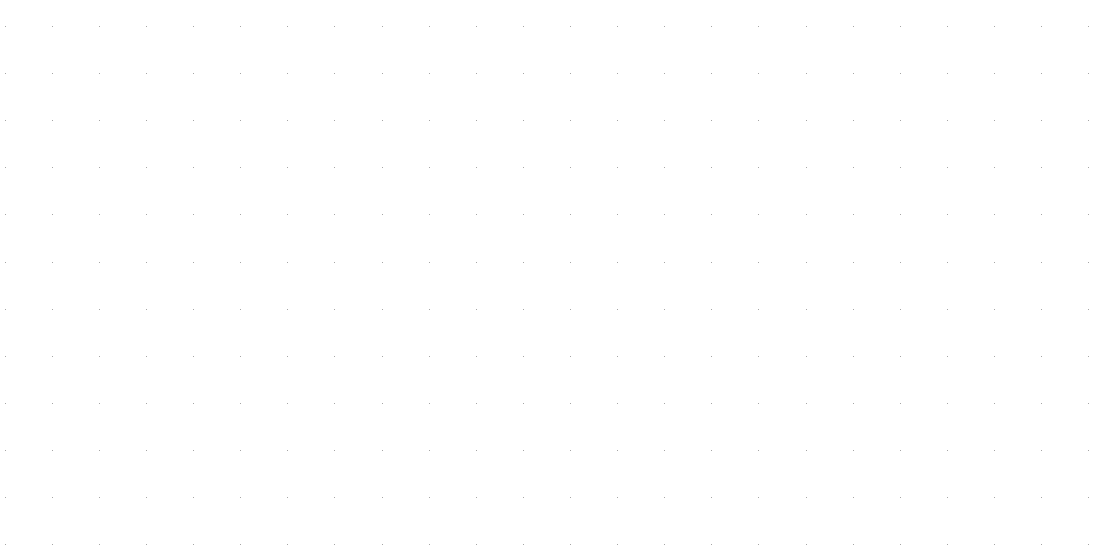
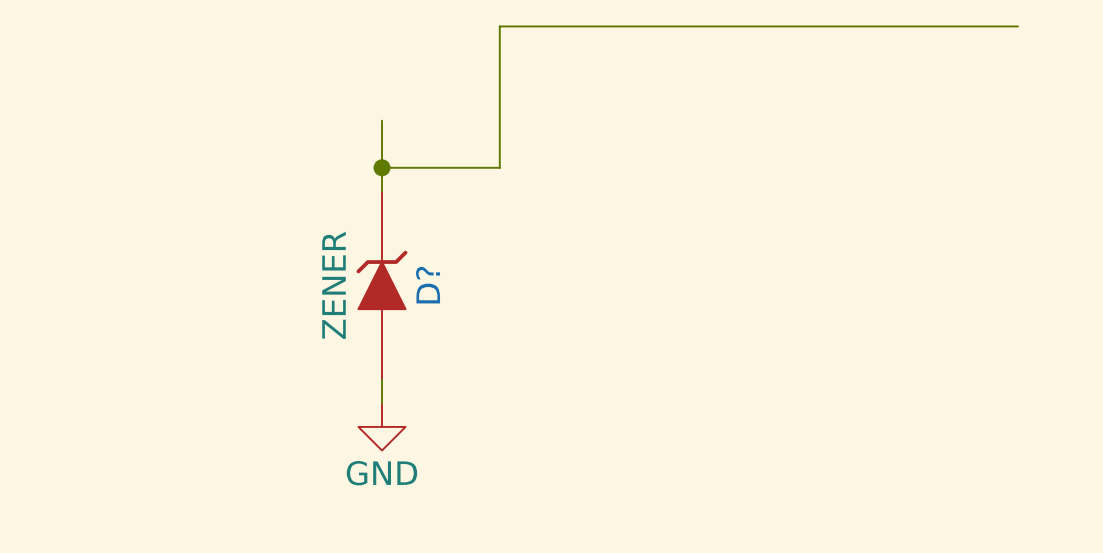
wire: none -> (1018, 26) (499, 26) (499, 167) (382, 167)
wire: none -> (382, 120) (382, 191)
junction: none -> (382, 167)
D?: none -> ZENER (382, 285)
wire: none -> (382, 379) (382, 403)
power symbol: none -> GND (382, 426)

